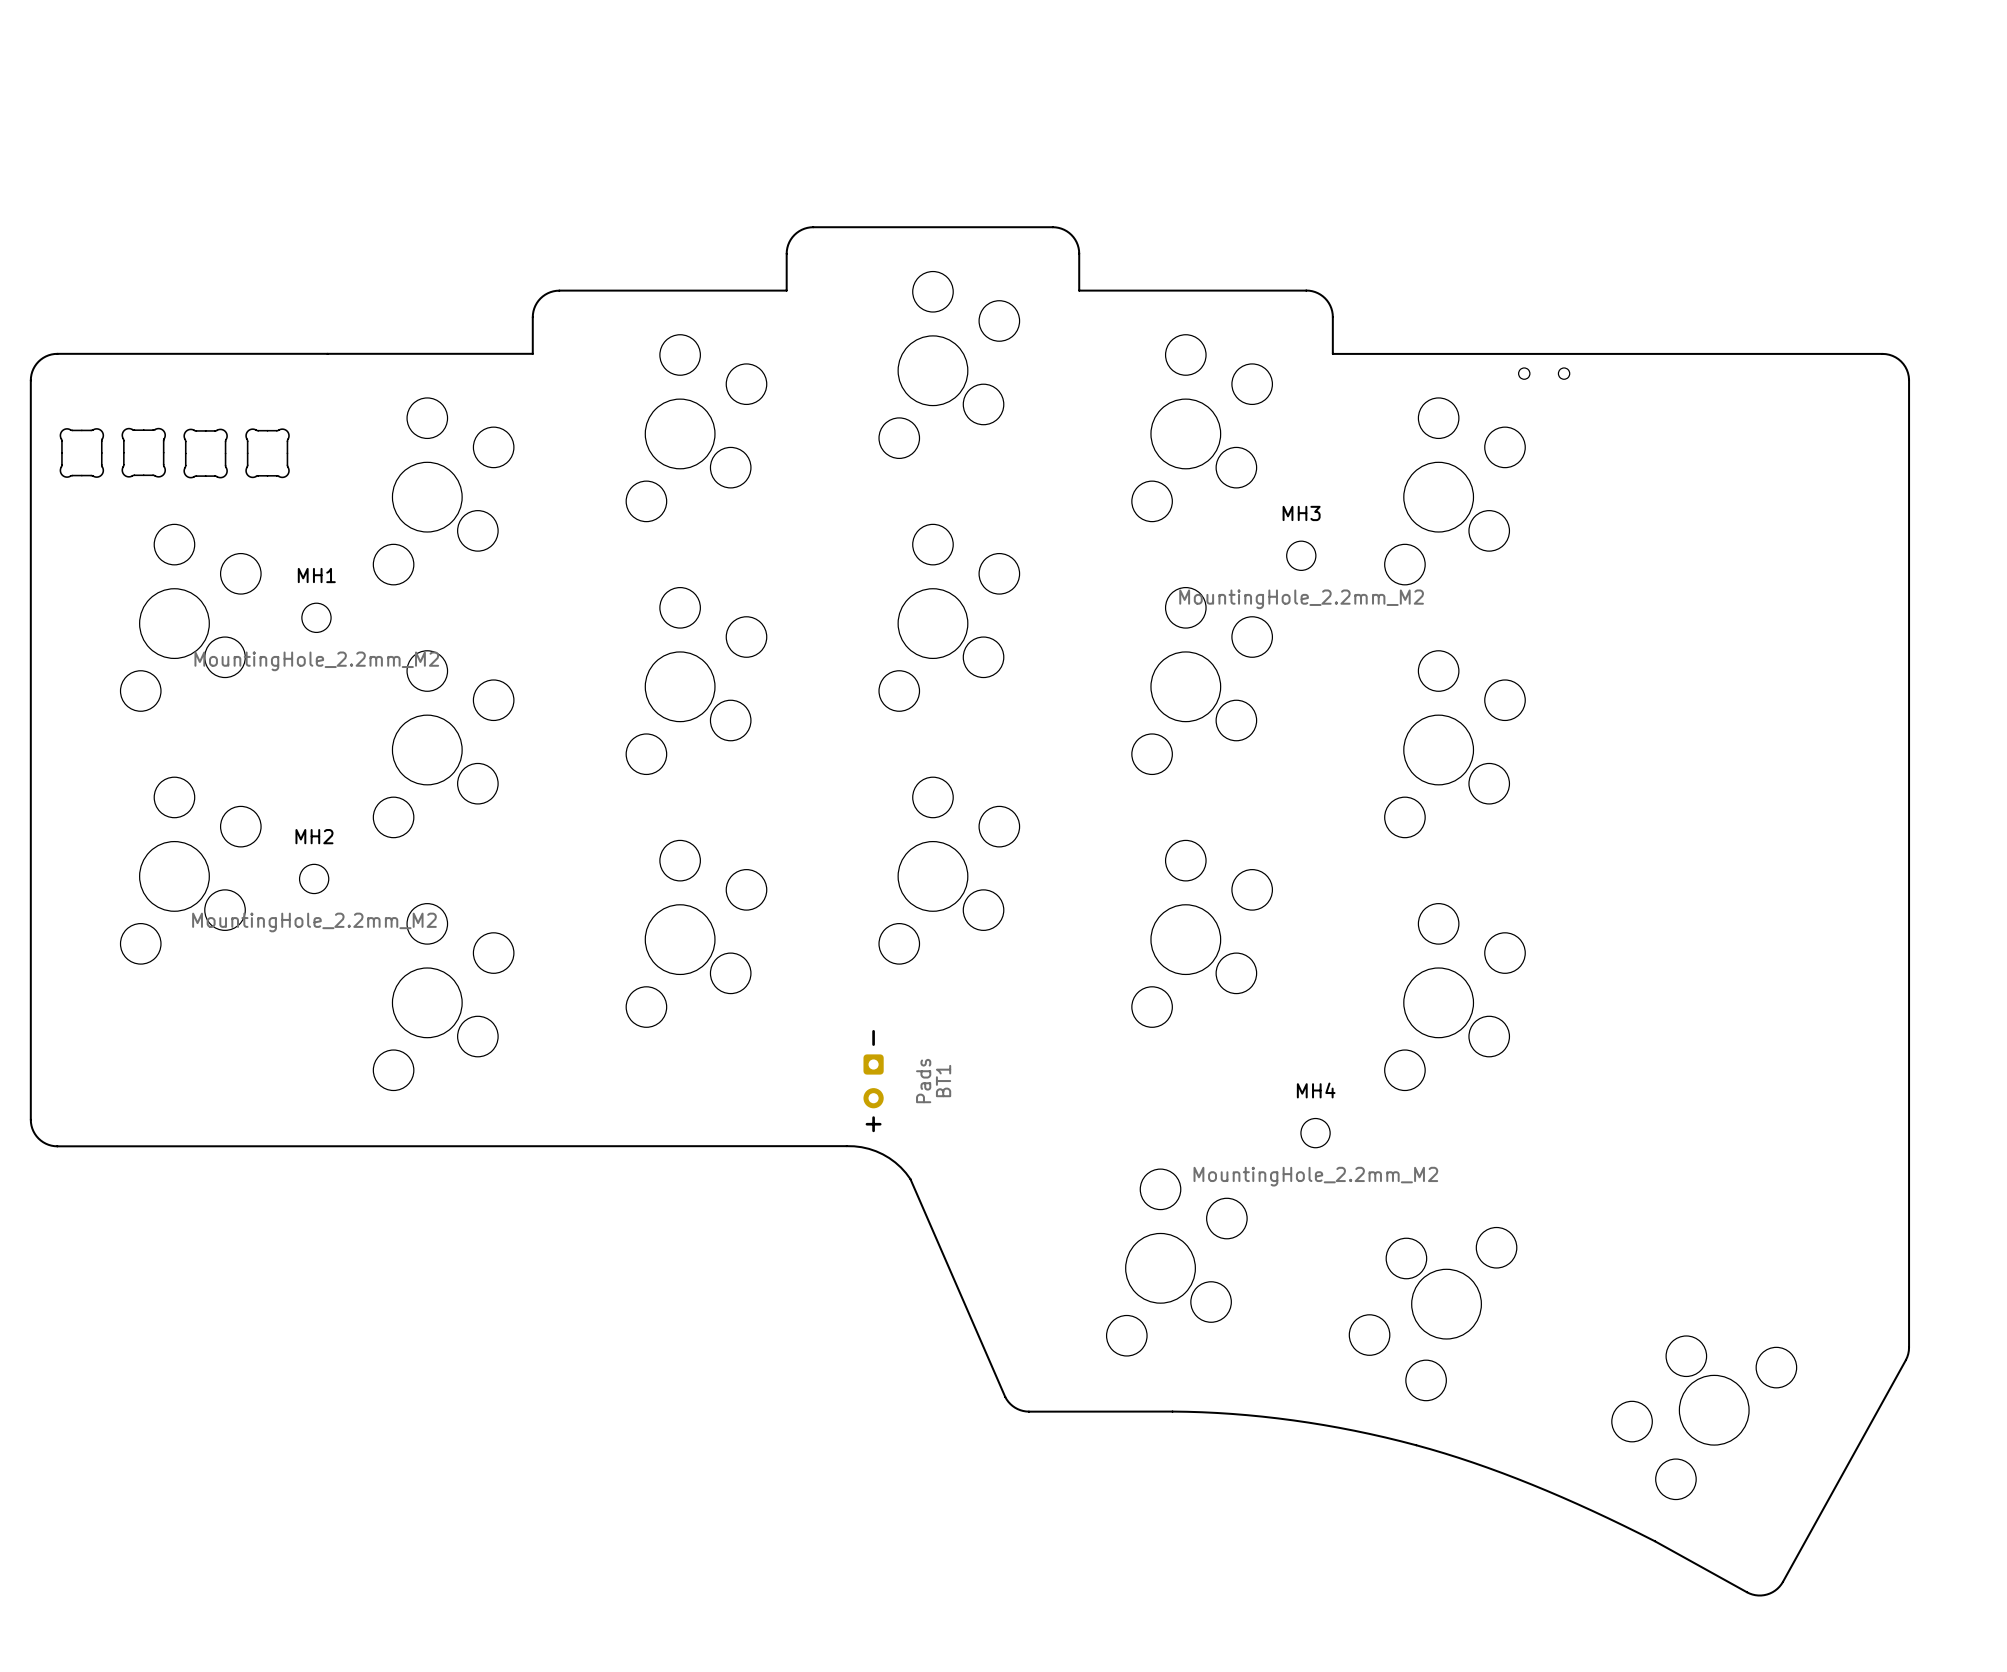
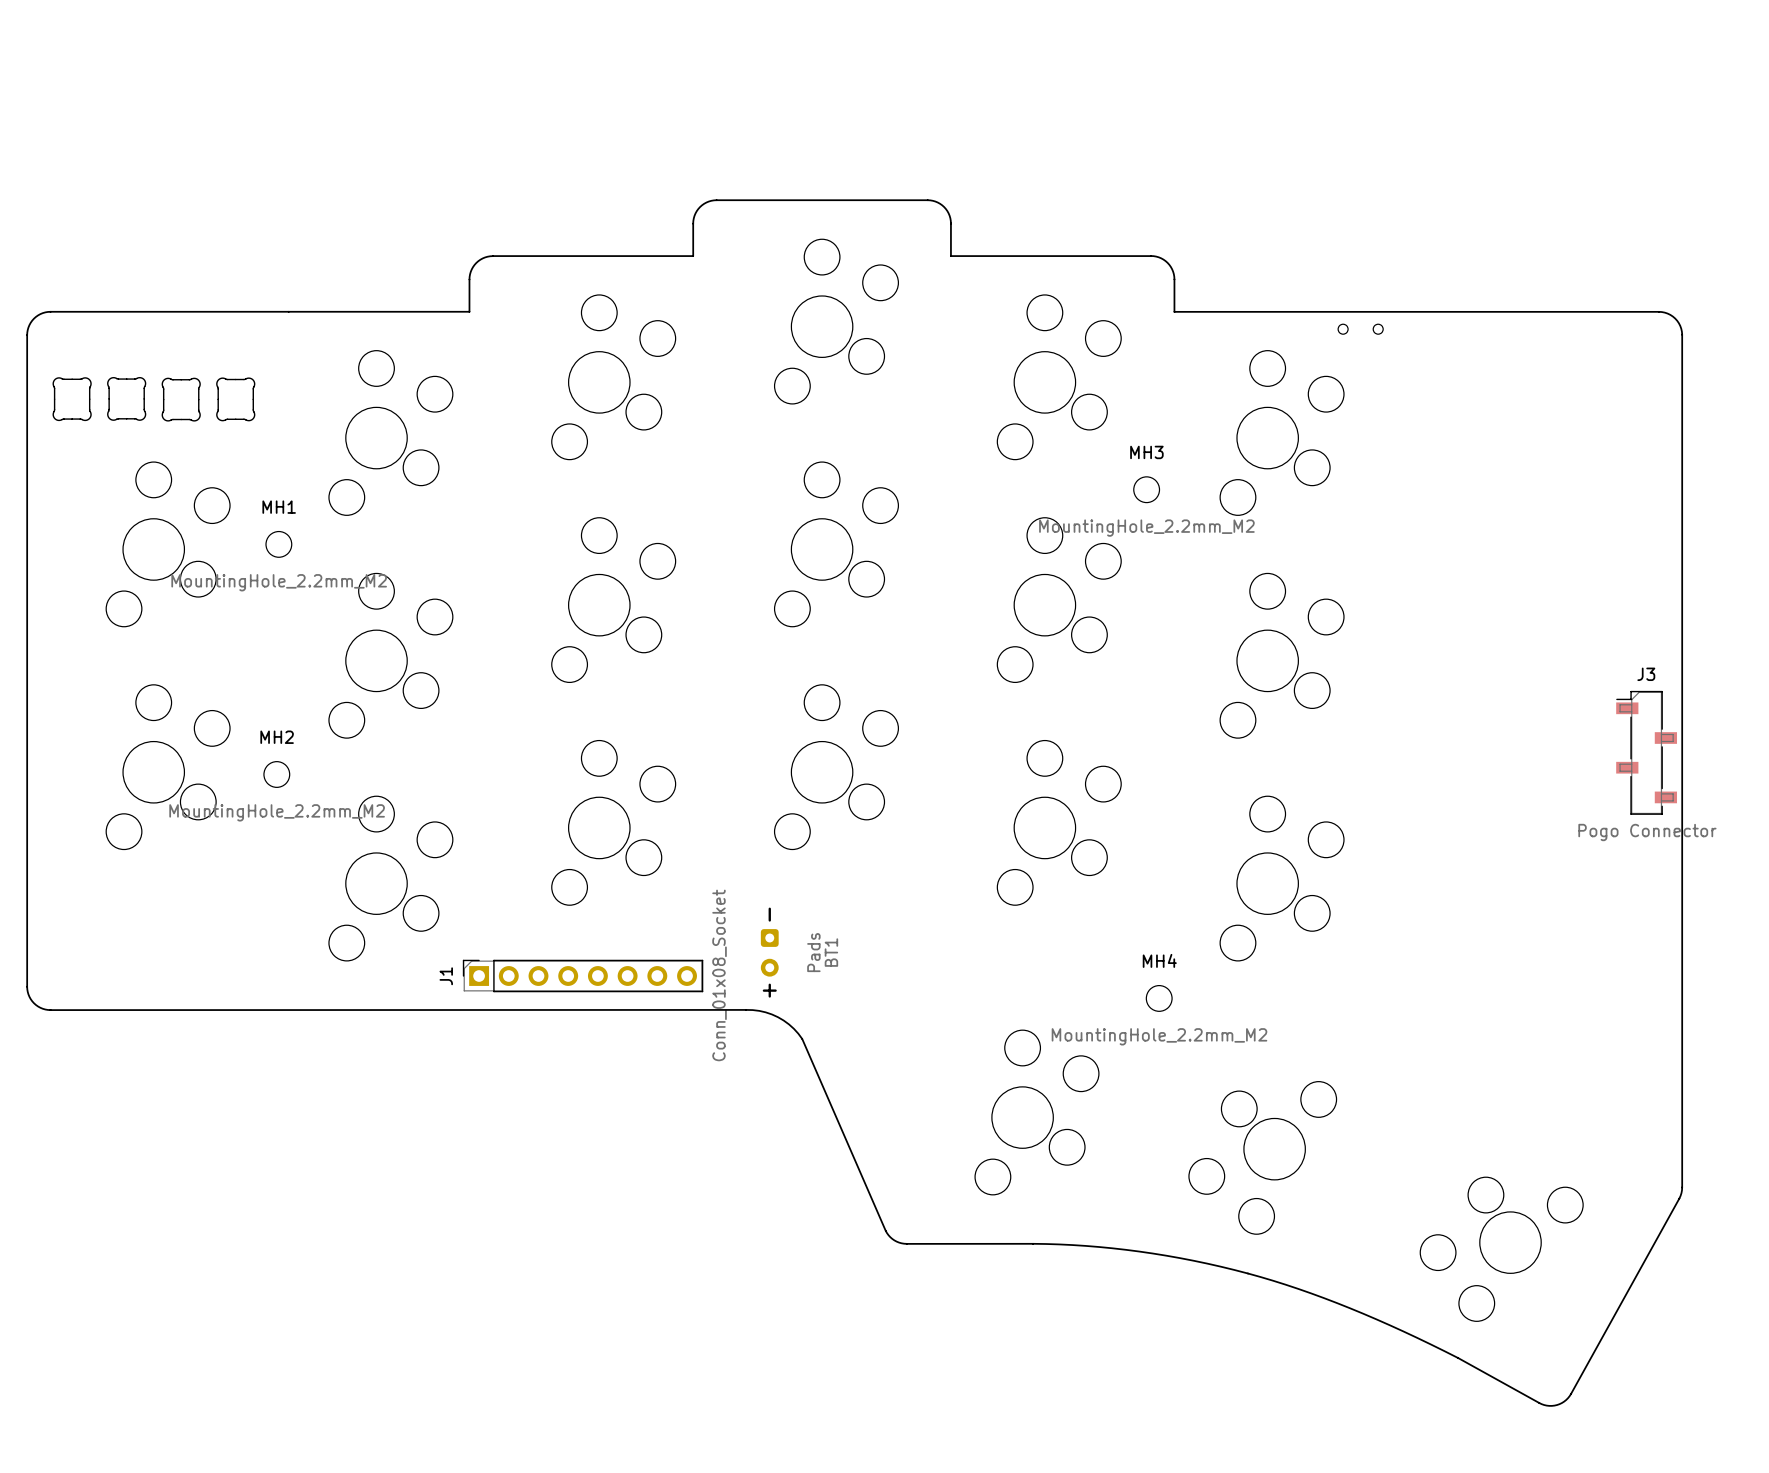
J3: none -> Pogo Connector (1646, 752)
J1: none -> Conn_01x08_Socket (583, 976)

